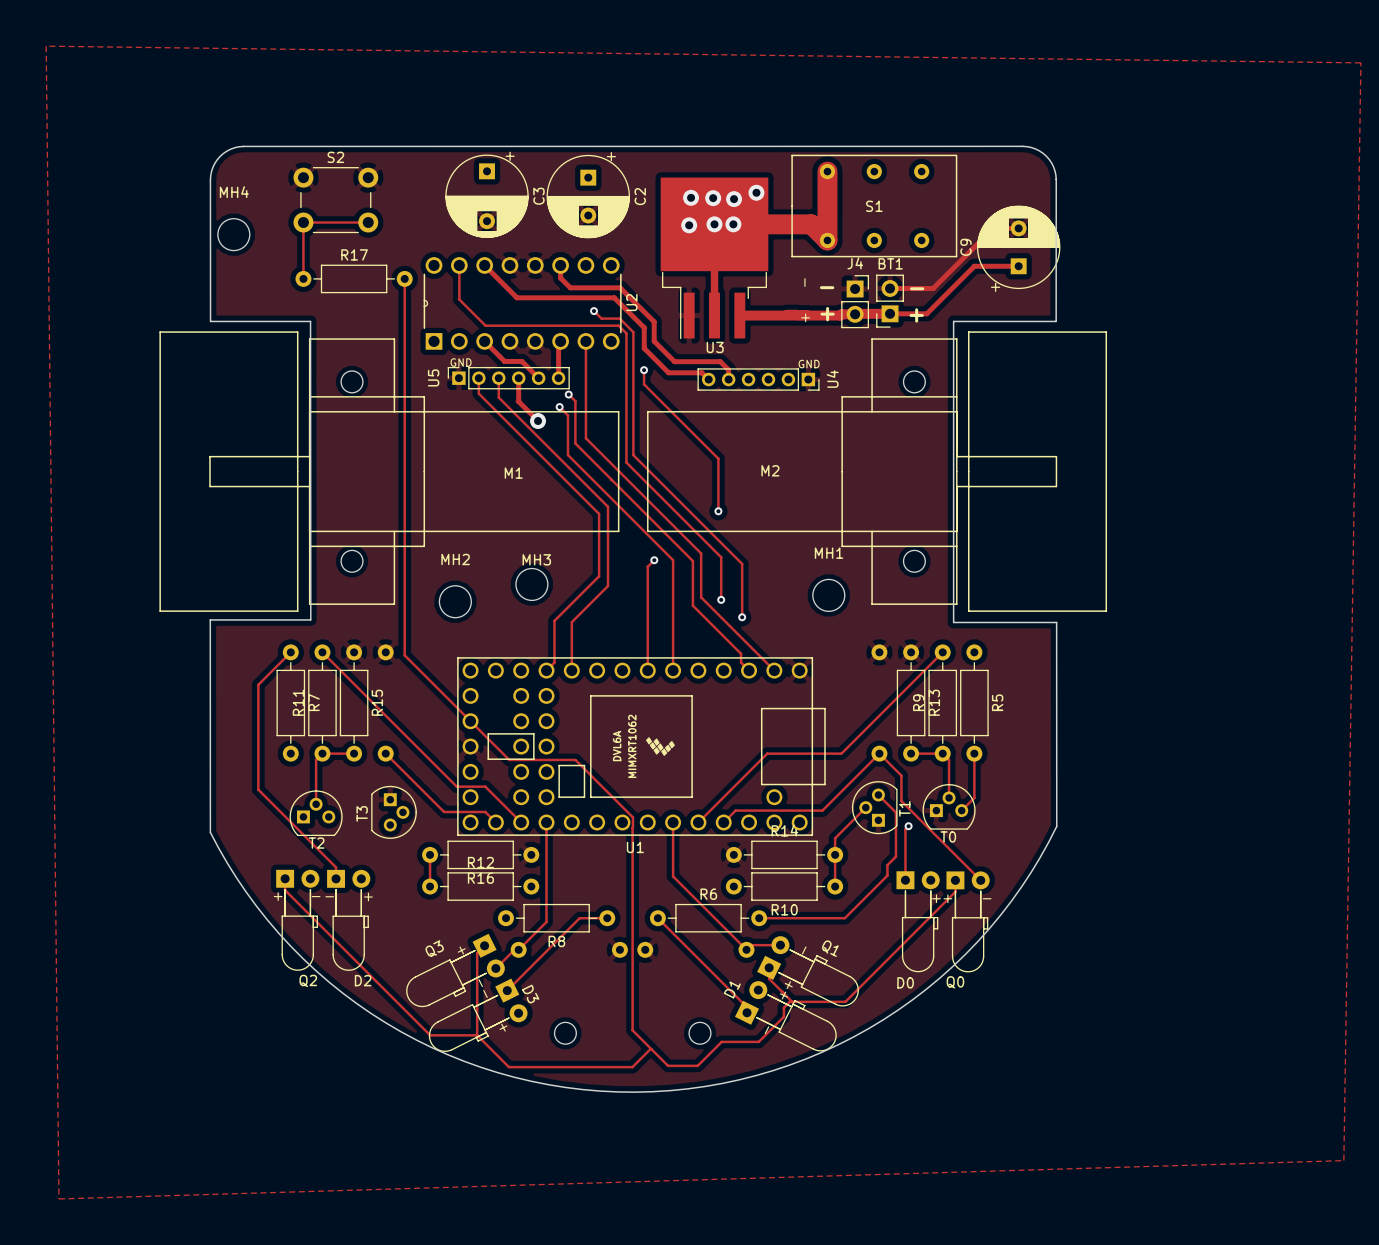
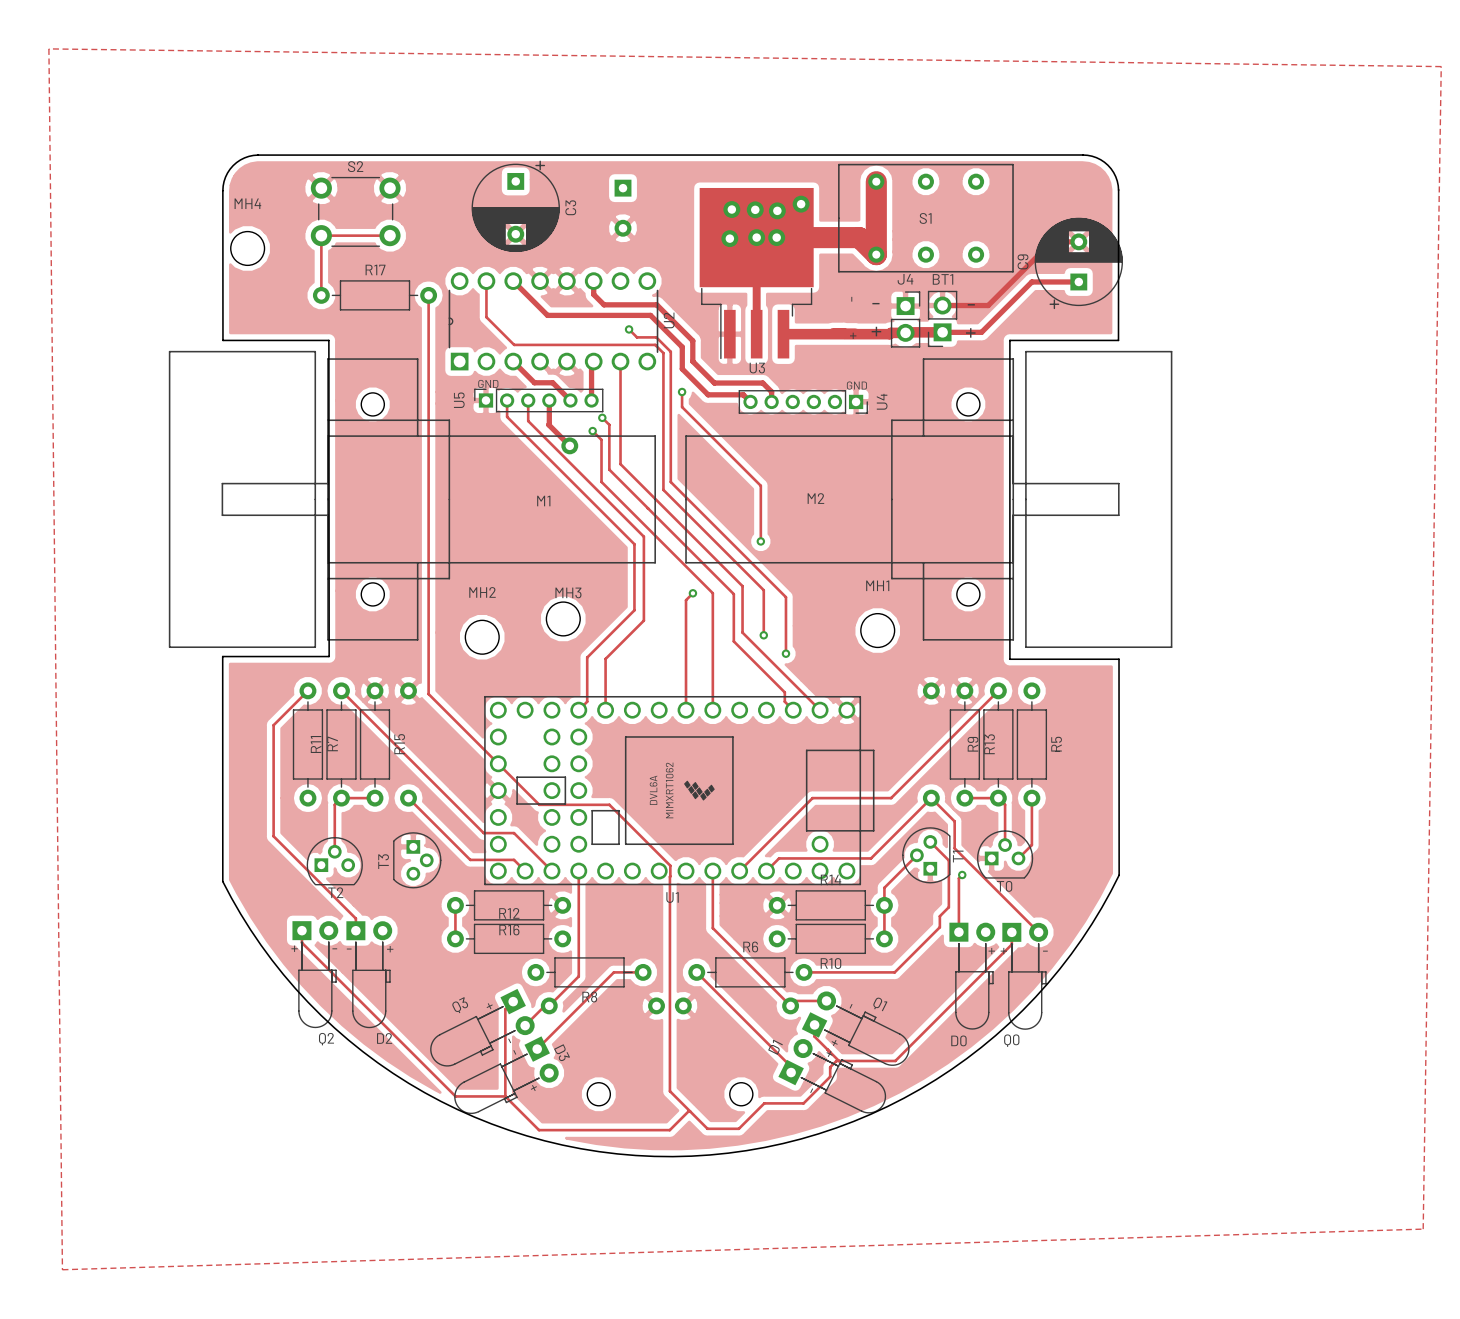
C2 side: top (588, 195) -> bottom (623, 208)

